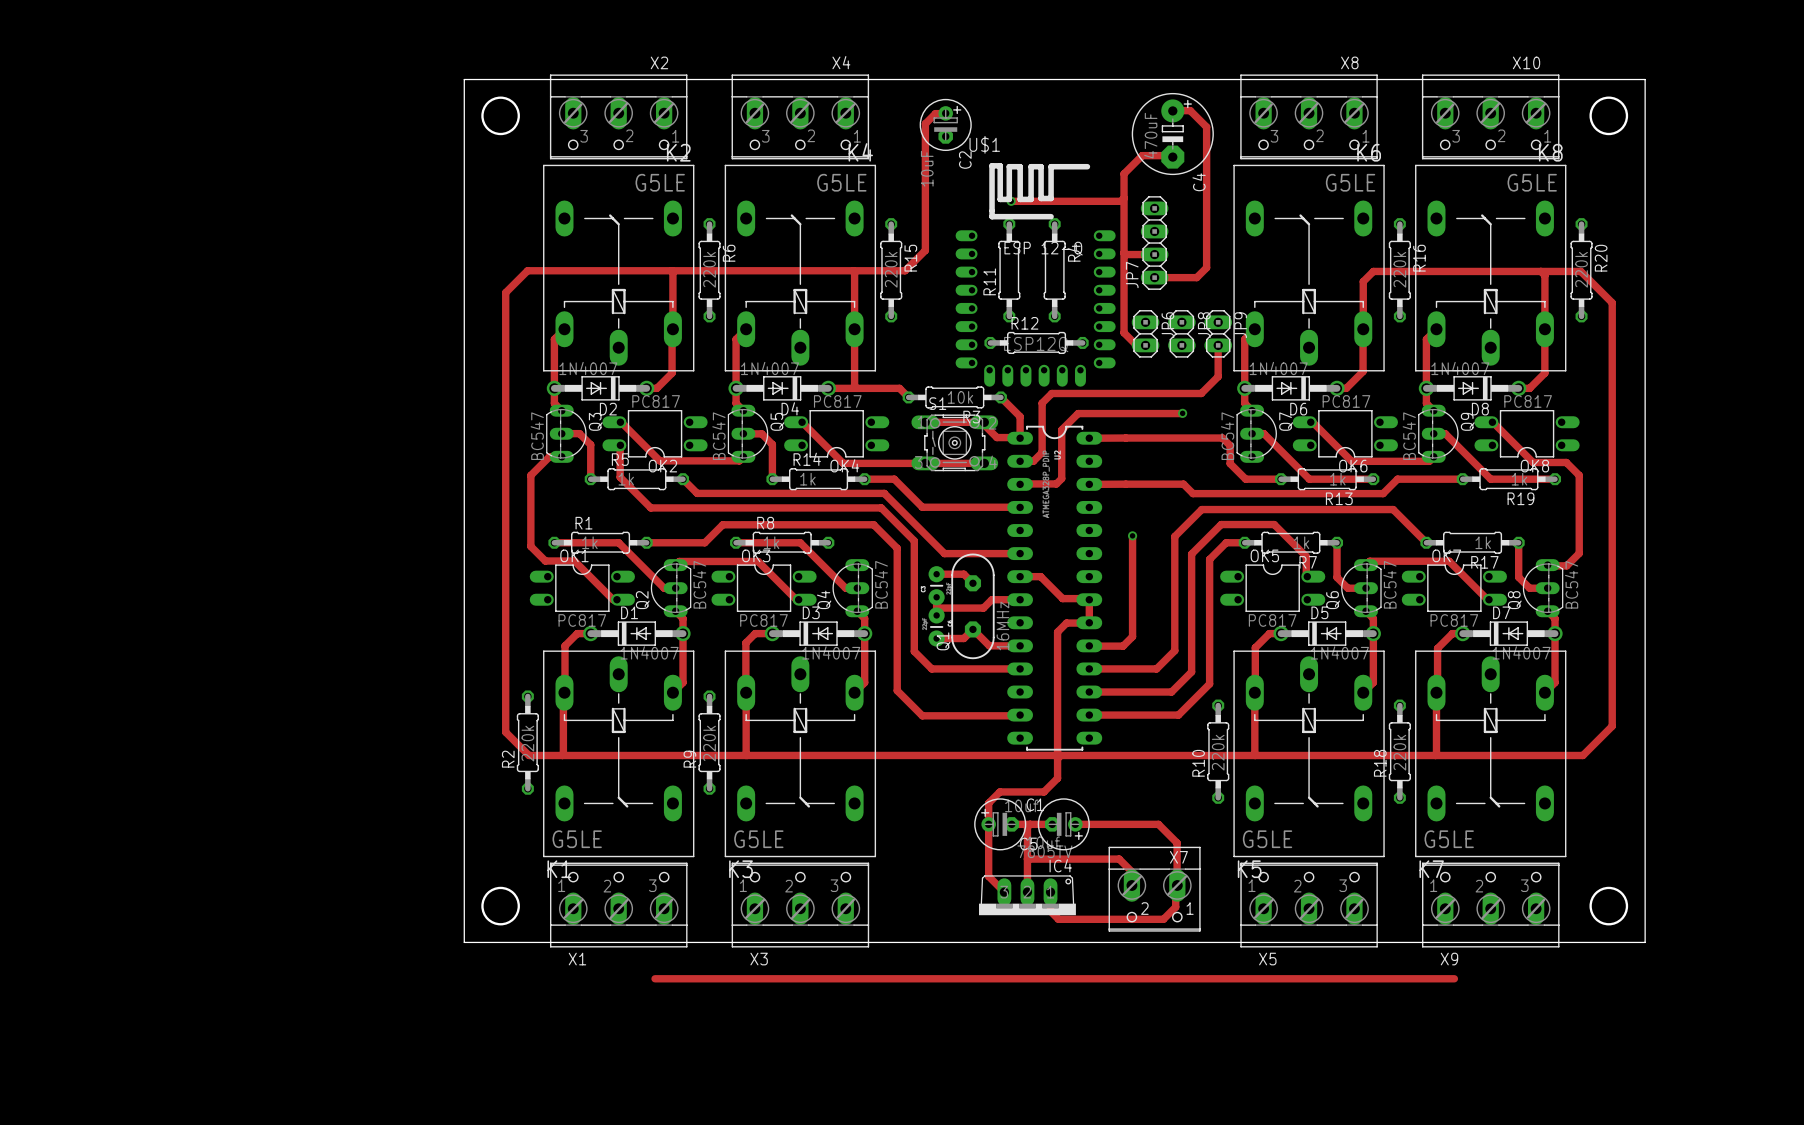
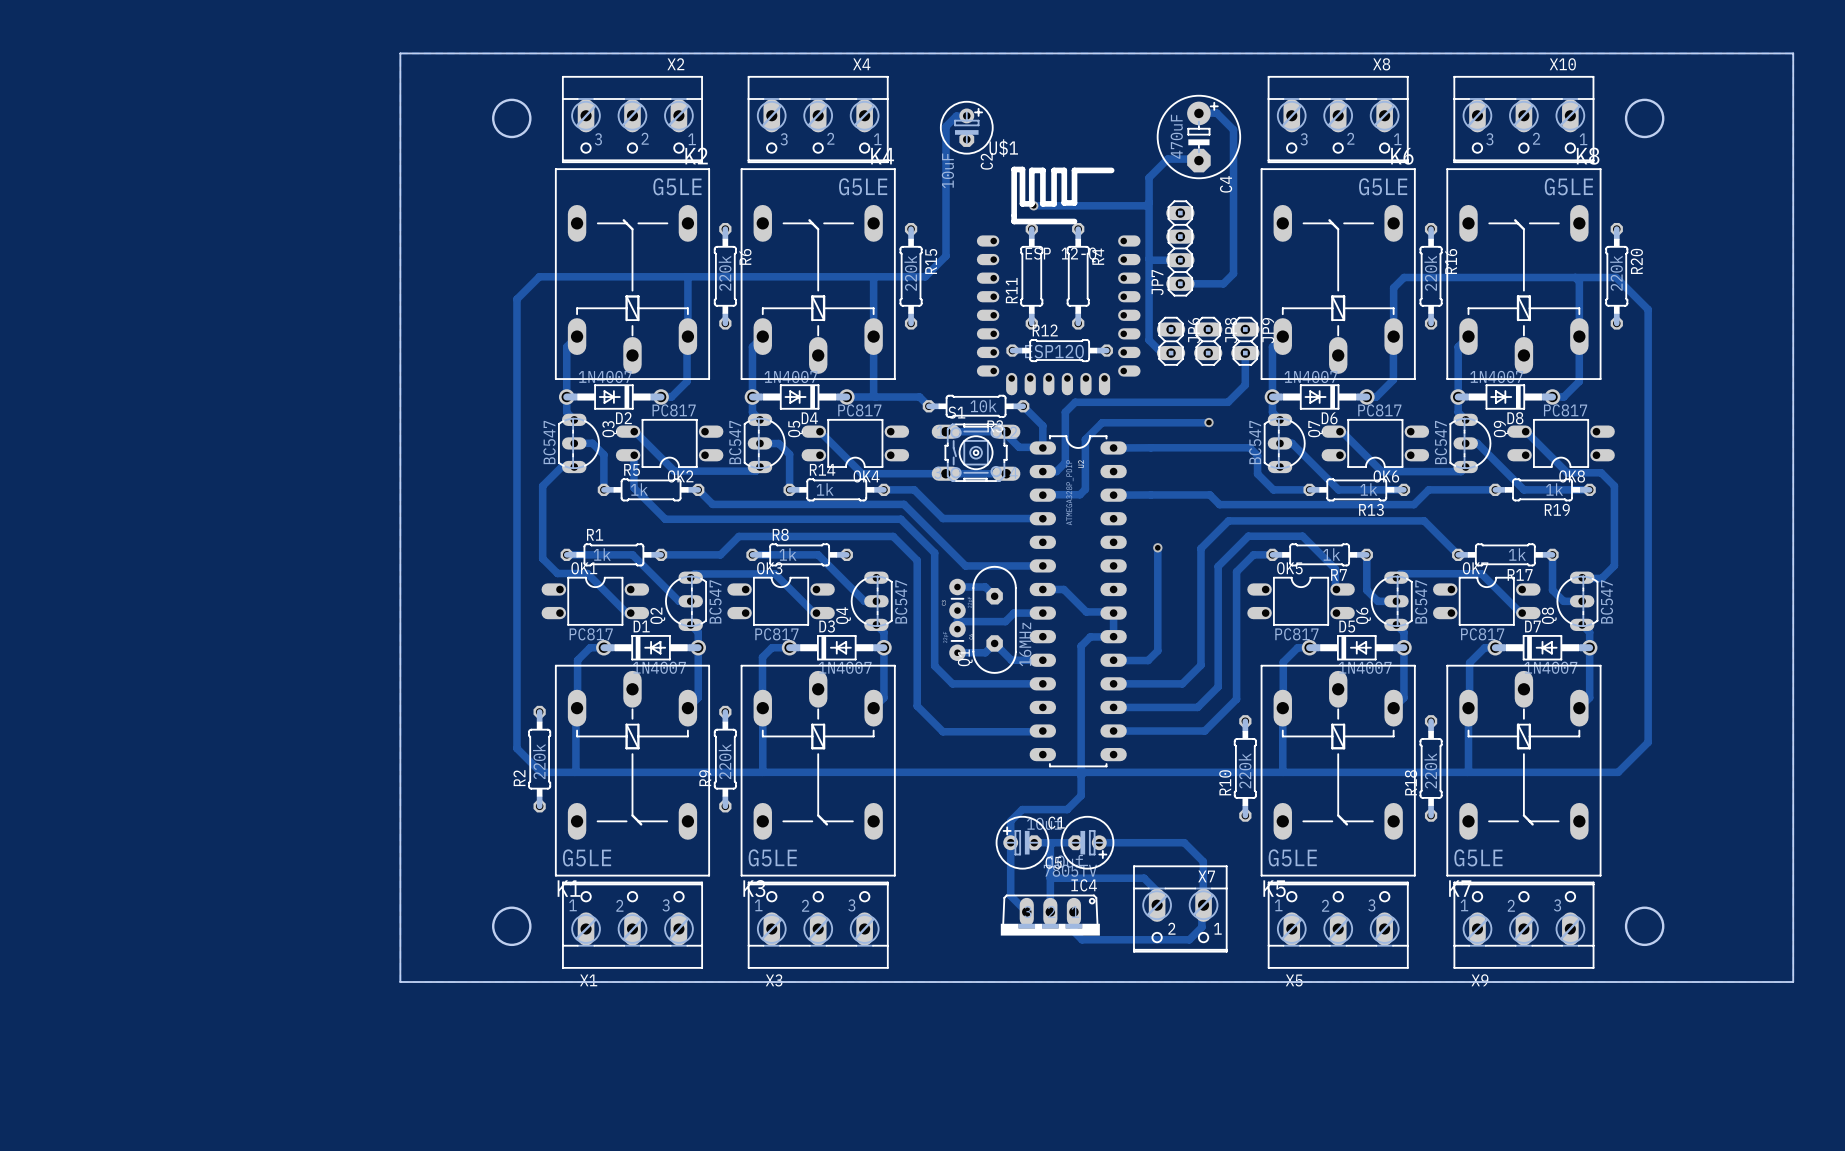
board edge: (464, 79) (1645, 79) (1645, 942) (464, 942) (464, 79) -> (400, 53) (400, 982) (1793, 982) (1793, 53) (400, 53)
track: (655, 978) (1454, 978) -> none

